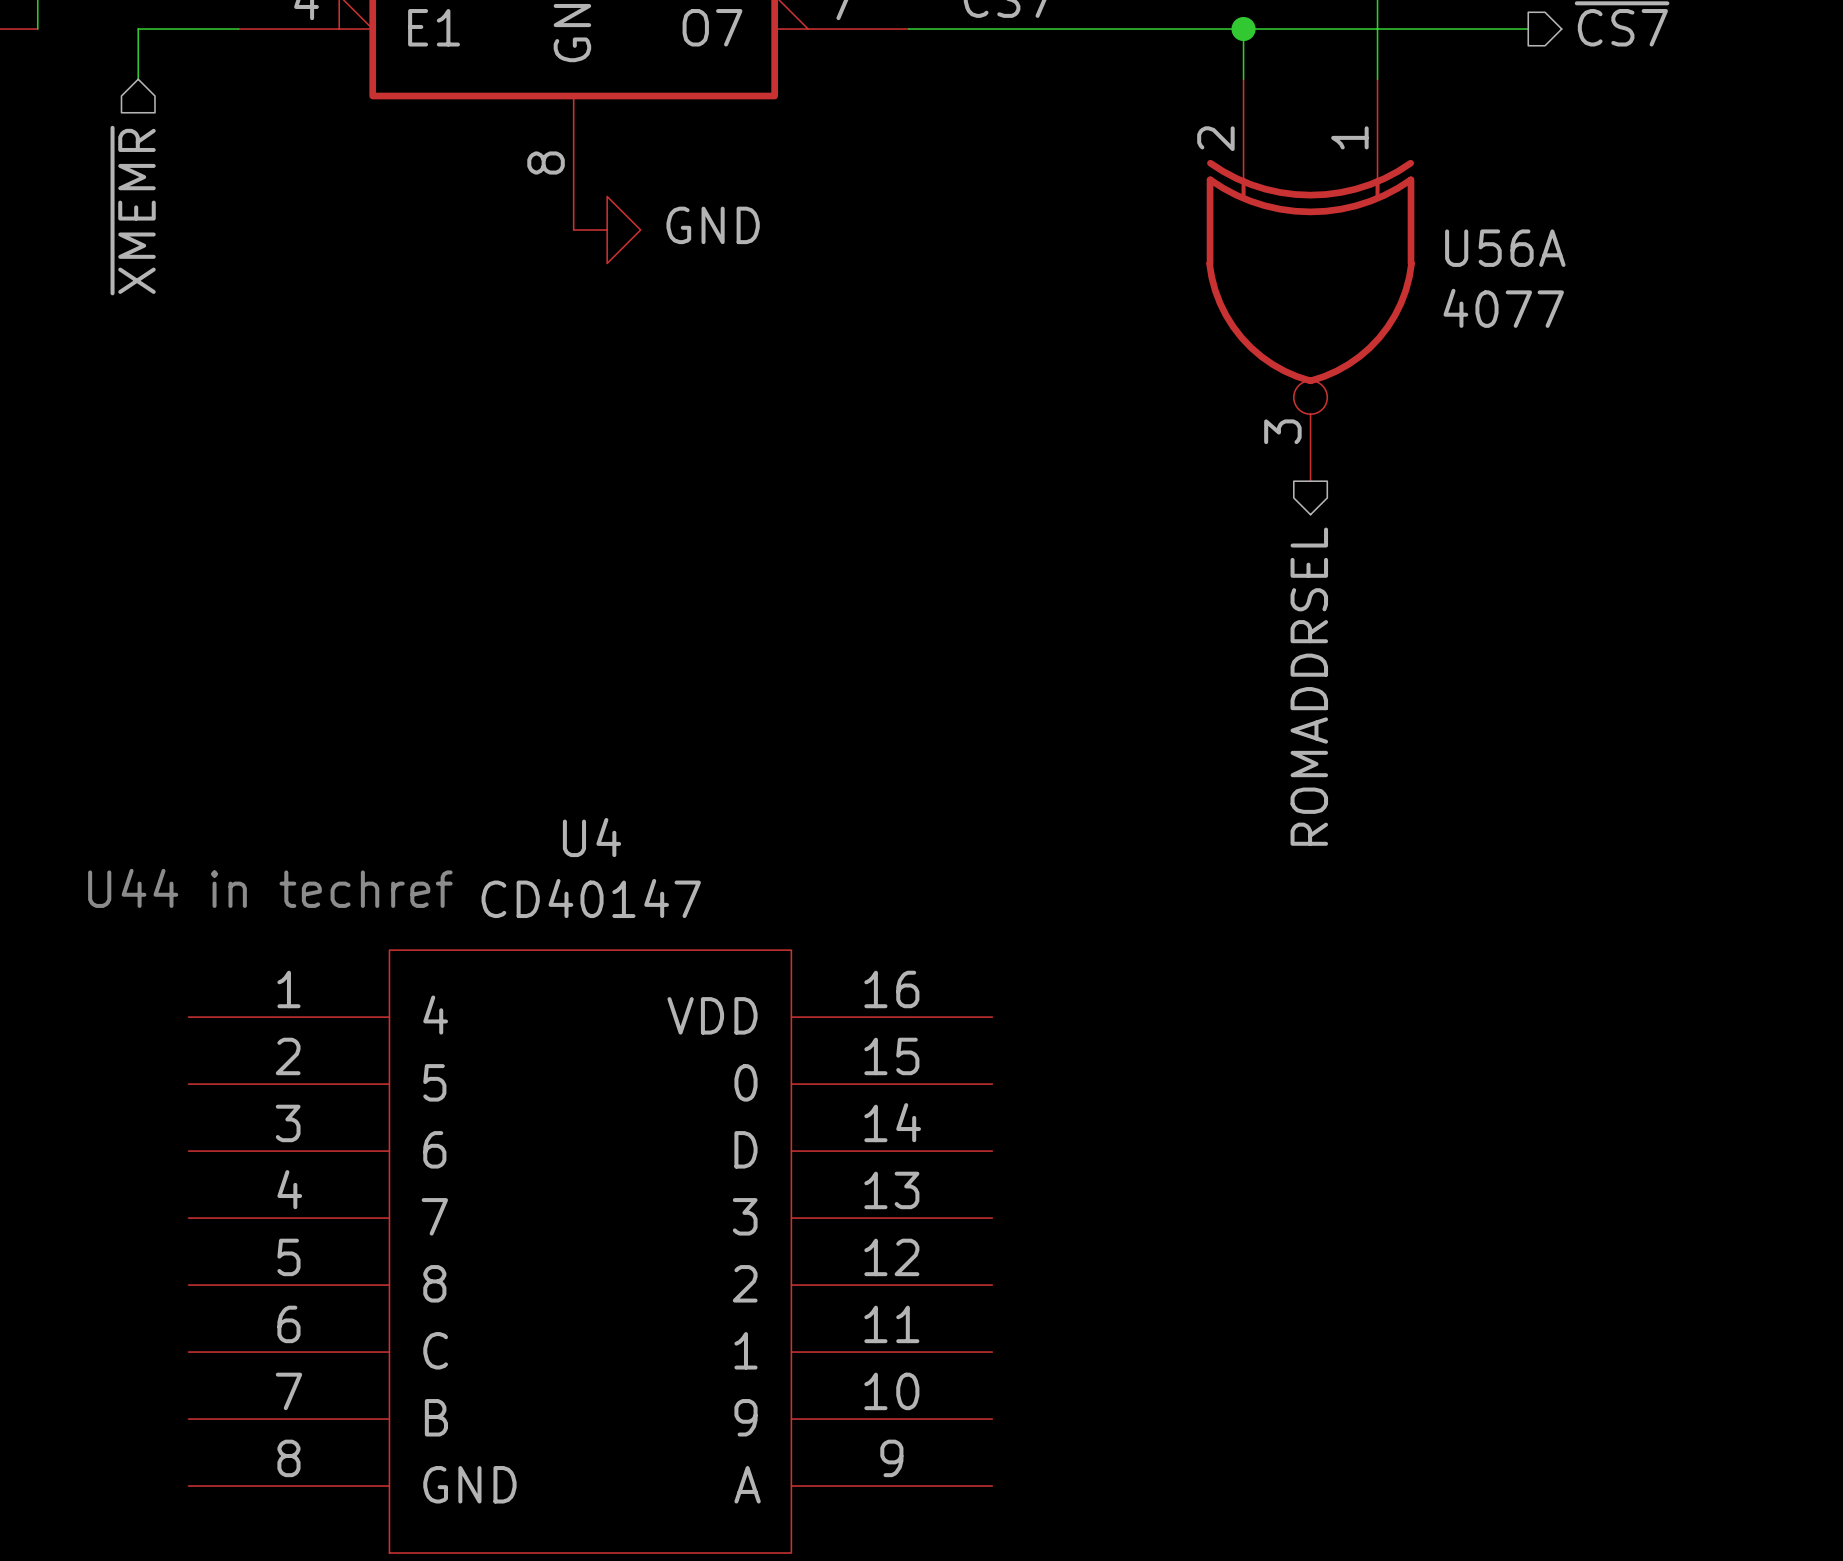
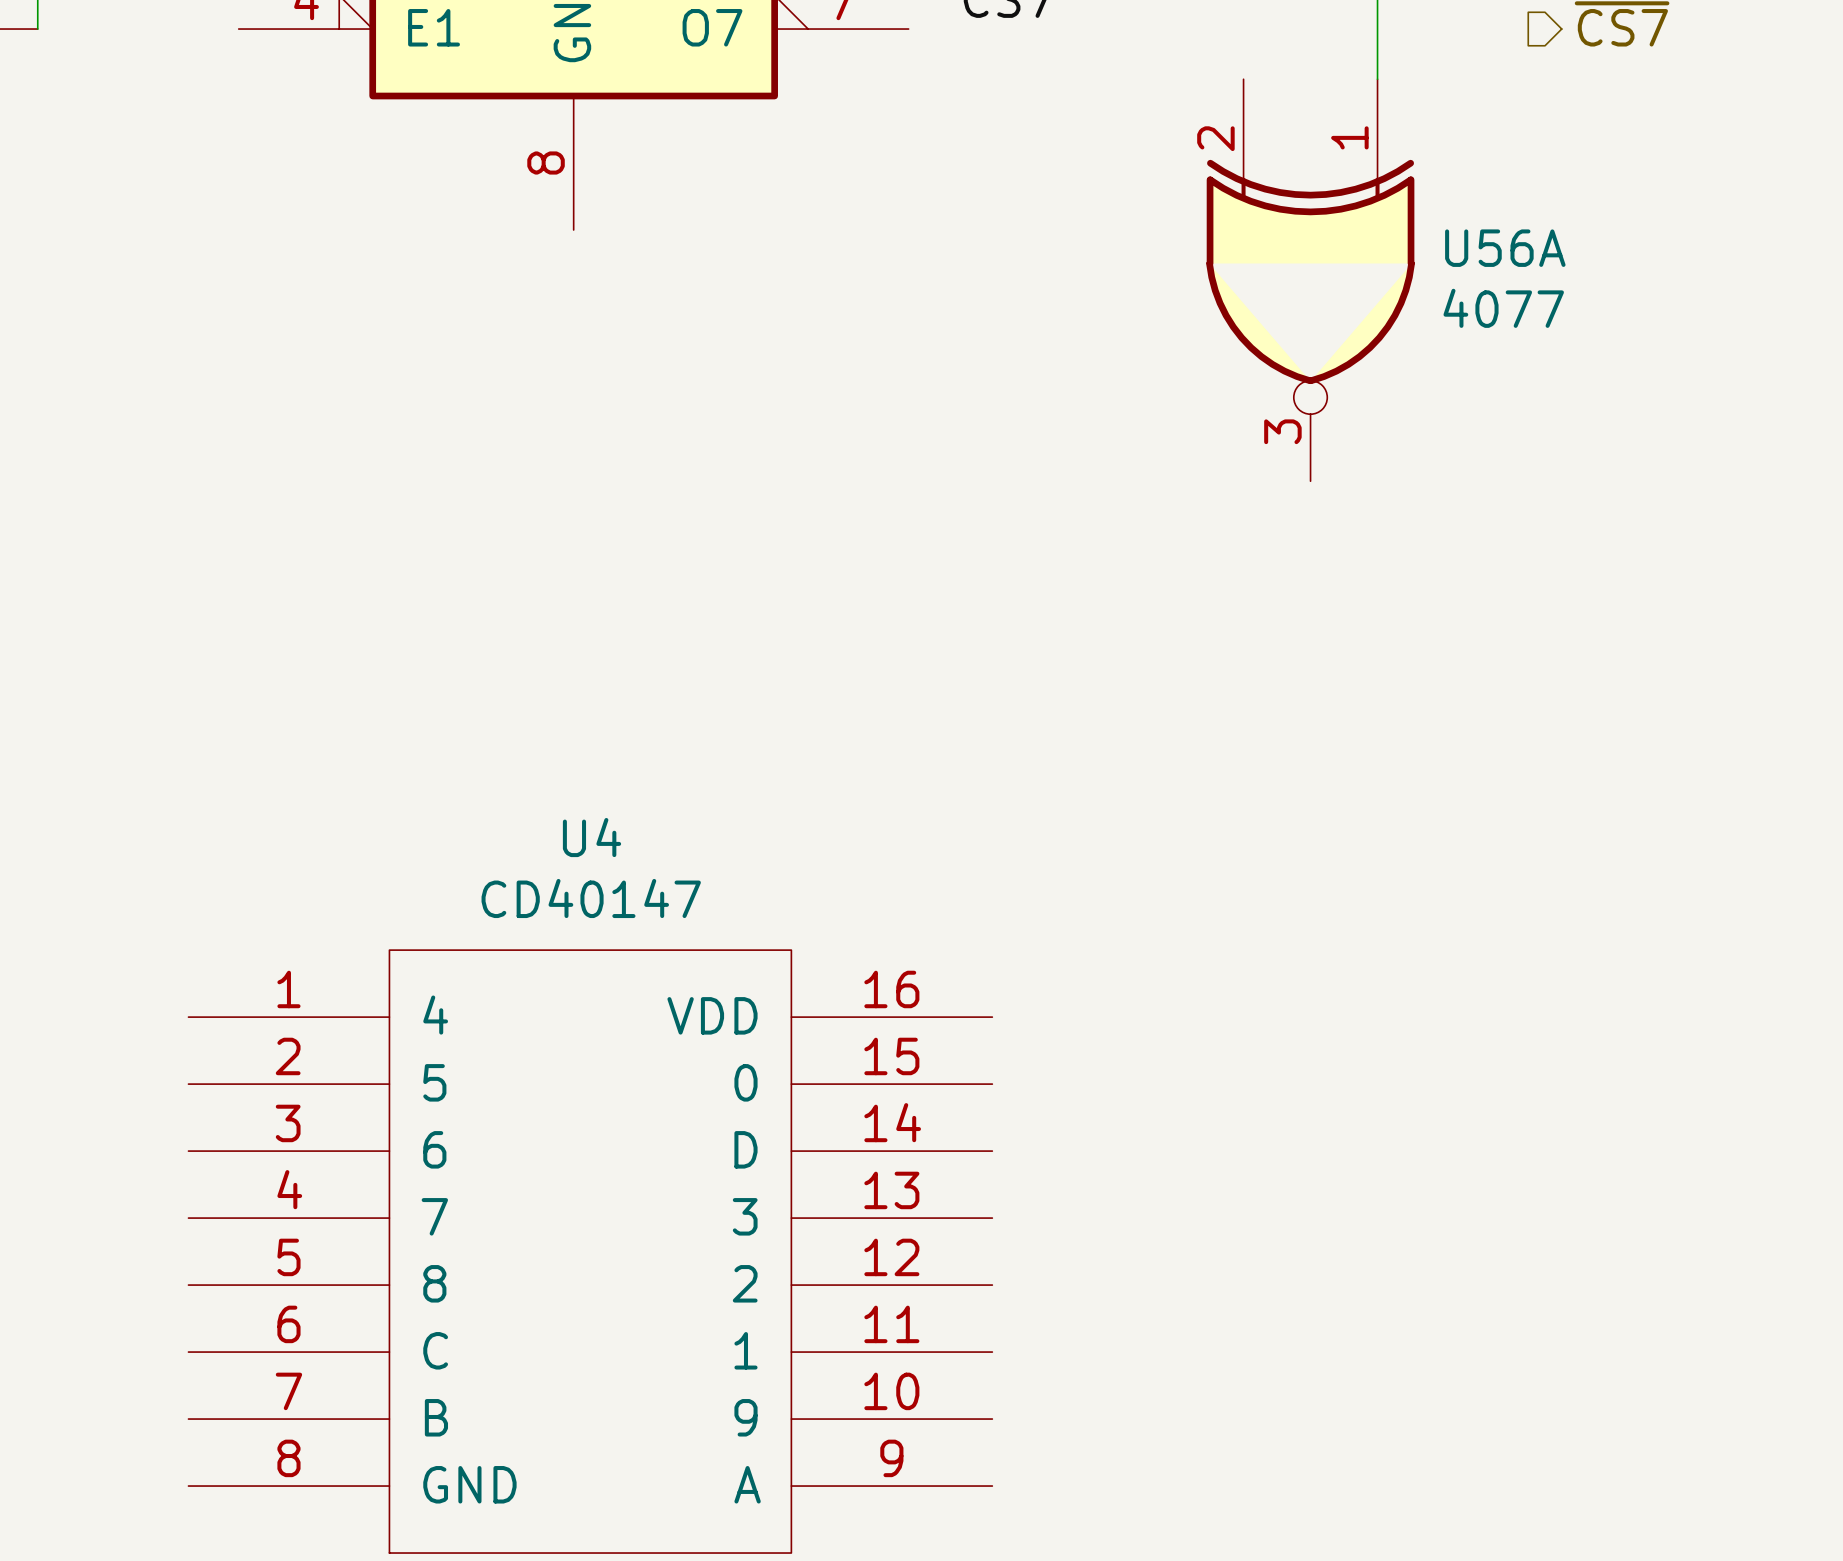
wire: (238, 29) (138, 29) (138, 79) -> none
wire: (908, 29) (1528, 29) -> none
wire: (1243, 29) (1243, 79) -> none
junction: (1243, 29) -> none
hierarchical label: ~{XMEMR} (133, 210) -> none
power symbol: GND (607, 229) -> none
hierarchical label: ROMADDRSEL (1309, 686) -> none
text: U44 in techref (270, 888) -> none

